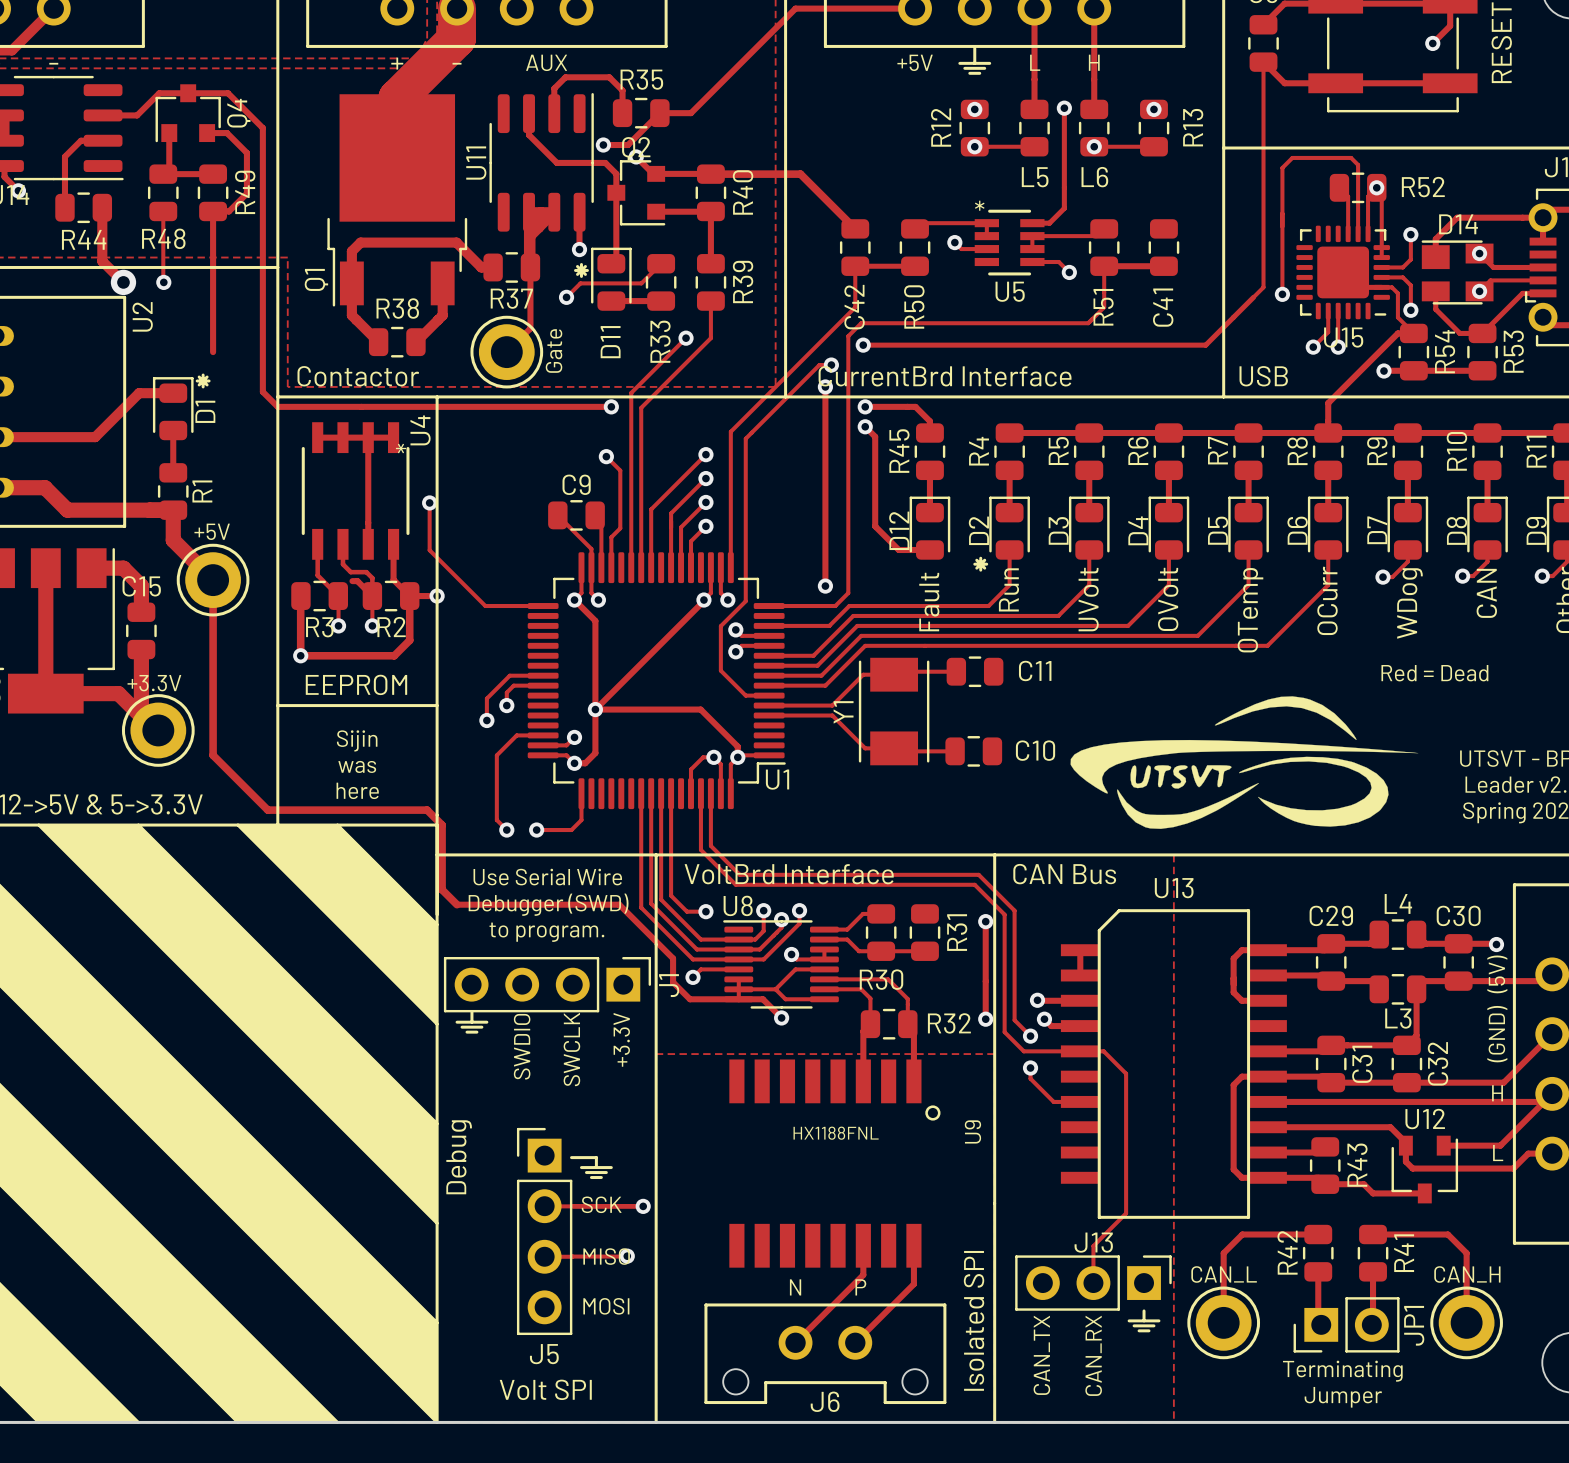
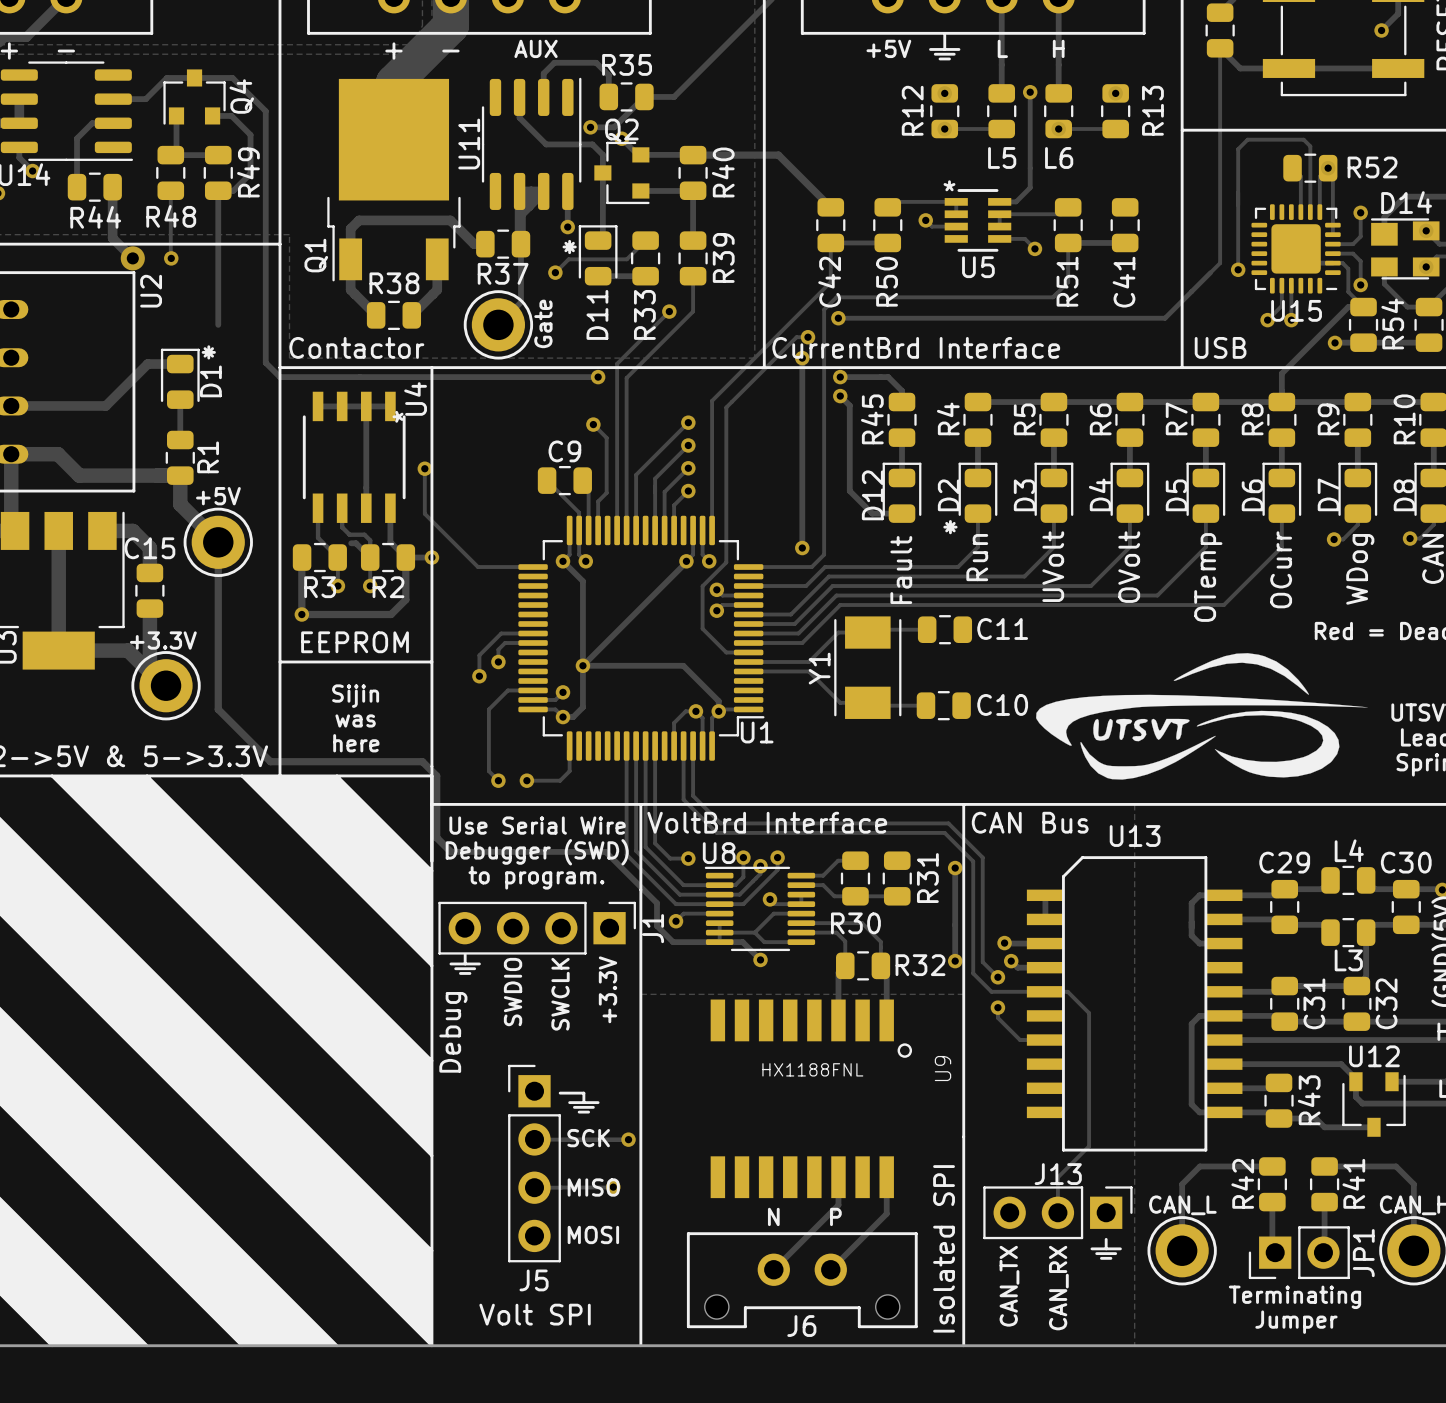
text position: Debug (459, 1157) -> Debug (453, 1032)

